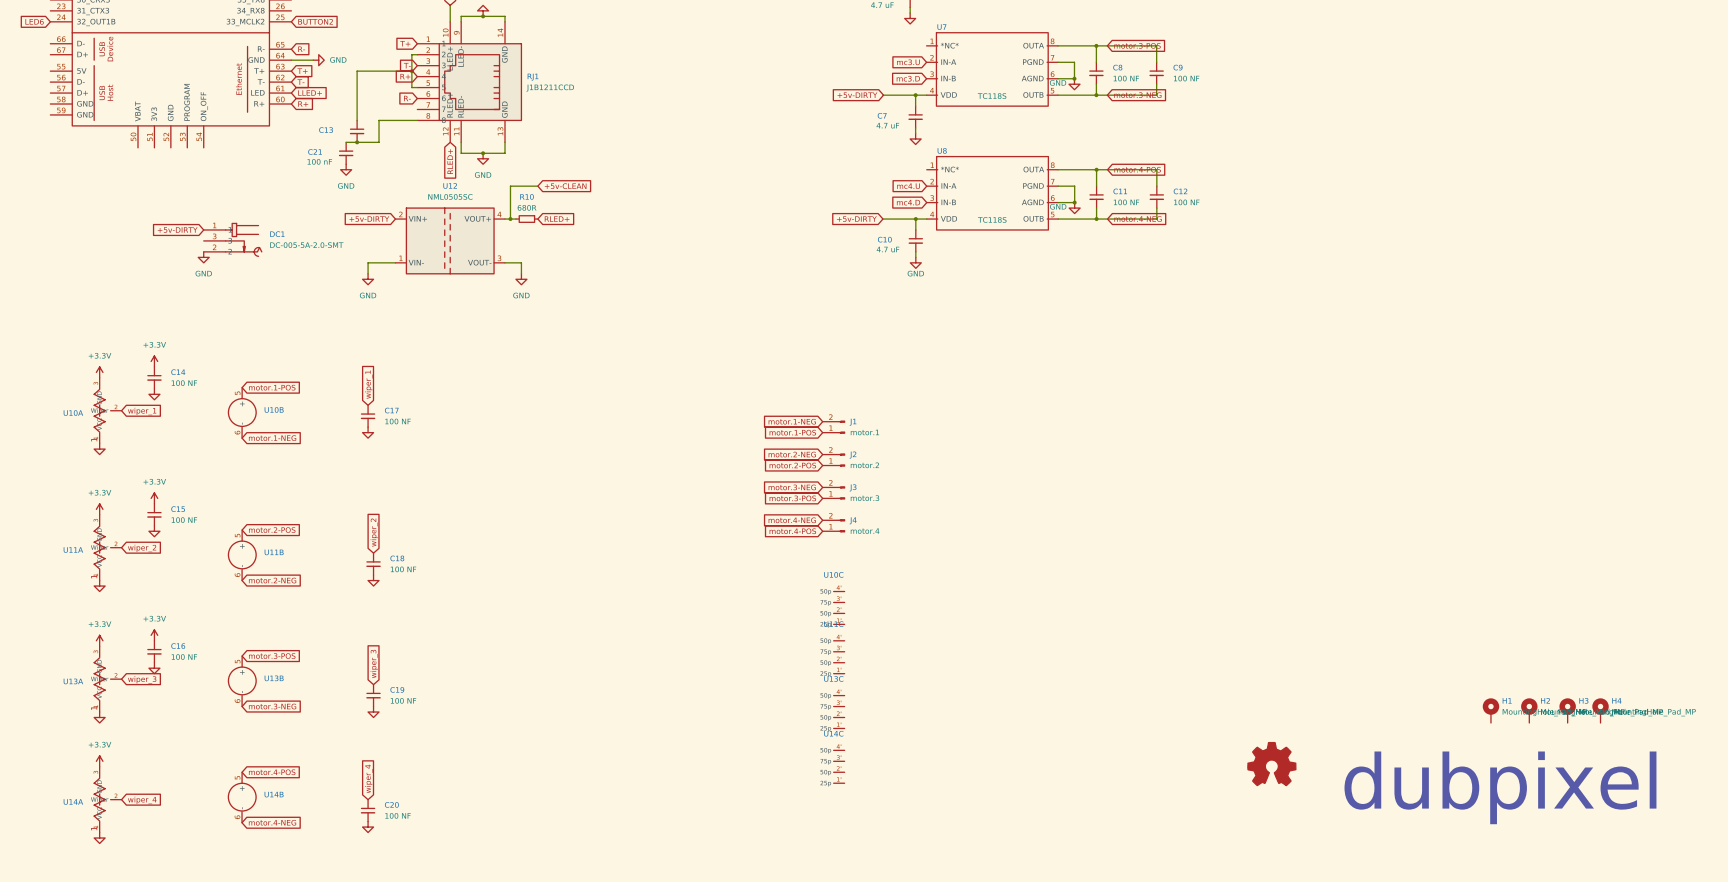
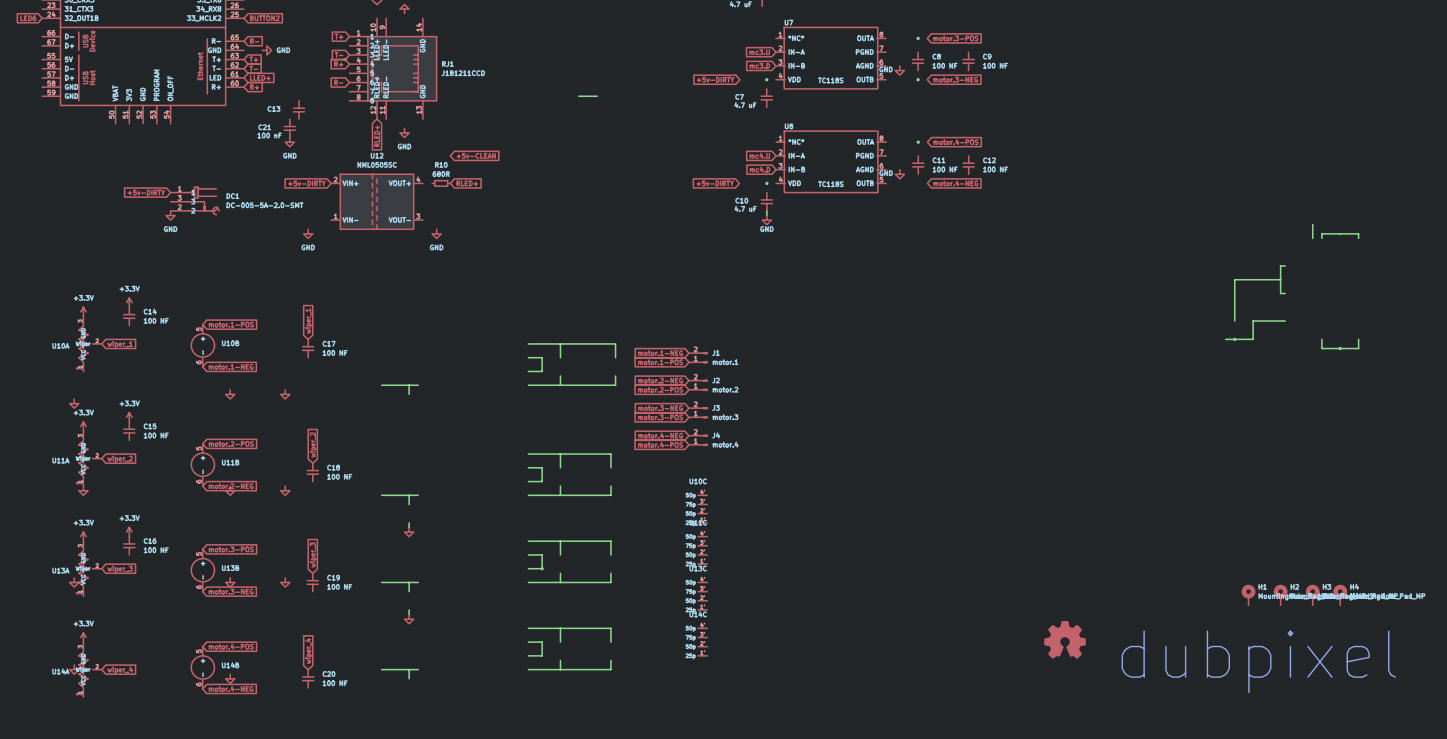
wire: (450, 5) (450, 21) -> none
wire: (910, 7) (910, 13) -> none
junction: (483, 16) -> none
power symbol: (910, 18) -> none
wire: (461, 21) (461, 16) (505, 16) (505, 21) -> none
wire: (1058, 45) (1156, 45) (1156, 62) -> none
wire: (1096, 45) (1096, 62) -> none
wire: (417, 54) (411, 54) (411, 87) (417, 87) -> none
wire: (291, 60) (313, 60) -> none
wire: (1058, 62) (1074, 62) (1074, 78) (1058, 78) -> none
wire: (411, 71) (357, 71) (357, 120) -> none
junction: (1074, 78) -> none
wire: (1096, 84) (1096, 95) -> none
wire: (1156, 84) (1156, 95) (1058, 95) -> none
wire: (882, 95) (926, 95) -> none
wire: (915, 95) (915, 106) -> none
wire: none -> (578, 96) (597, 96)
wire: (417, 120) (379, 120) (379, 142) (346, 142) -> none
wire: (915, 128) (915, 133) -> none
power symbol: (915, 139) -> none
junction: (357, 142) -> none
wire: (461, 142) (461, 153) (505, 153) (505, 142) -> none
junction: (483, 153) -> none
wire: (1058, 169) (1156, 169) (1156, 186) -> none
wire: (1096, 169) (1096, 186) -> none
wire: (537, 186) (510, 186) (510, 219) -> none
wire: (1058, 186) (1074, 186) (1074, 202) (1058, 202) -> none
junction: (1074, 202) -> none
wire: (1096, 208) (1096, 219) -> none
wire: (1156, 208) (1156, 219) (1058, 219) -> none
wire: (505, 219) (515, 219) -> none
junction: (510, 219) -> none
wire: (882, 219) (926, 219) -> none
wire: (915, 219) (915, 229) -> none
junction: (1096, 219) -> none
wire: (395, 262) (368, 262) (368, 273) -> none
wire: (505, 262) (521, 262) (521, 273) -> none
wire: none -> (1312, 224) (1312, 238)
wire: none -> (1321, 238) (1321, 233) (1358, 233) (1358, 238)
wire: none -> (1285, 265) (1280, 265) (1280, 293) (1285, 293)
wire: none -> (1280, 279) (1234, 279) (1234, 321)
wire: none -> (1285, 321) (1253, 321) (1253, 339) (1225, 339)
power symbol: (154, 394) -> none
junction: none -> (1234, 339)
wire: none -> (1321, 339) (1321, 348) (1358, 348) (1358, 339)
wire: none -> (528, 343) (615, 343) (615, 357)
wire: none -> (560, 343) (560, 357)
junction: none -> (1340, 348)
wire: none -> (528, 357) (542, 357) (542, 371) (528, 371)
power symbol position: (368, 432) -> (285, 394)
power symbol position: (99, 449) -> (74, 403)
wire: none -> (560, 376) (560, 385)
wire: none -> (615, 376) (615, 385) (528, 385)
wire: none -> (381, 385) (418, 385)
wire: none -> (409, 385) (409, 394)
power symbol: none -> (230, 394)
power symbol: (154, 531) -> none
wire: none -> (528, 454) (610, 454) (610, 467)
wire: none -> (560, 454) (560, 467)
wire: none -> (528, 467) (542, 467) (542, 481) (528, 481)
power symbol position: (373, 580) -> (285, 490)
wire: none -> (560, 486) (560, 495)
wire: none -> (610, 486) (610, 495) (528, 495)
power symbol: none -> (230, 490)
wire: none -> (381, 495) (418, 495)
wire: none -> (409, 495) (409, 504)
wire: none -> (409, 522) (409, 527)
power symbol: none -> (409, 532)
wire: none -> (528, 541) (610, 541) (610, 554)
wire: none -> (560, 541) (560, 554)
wire: none -> (528, 554) (542, 554) (542, 568) (528, 568)
power symbol: (154, 668) -> none
junction: none -> (542, 568)
wire: none -> (560, 573) (560, 582)
wire: none -> (610, 573) (610, 582) (528, 582)
power symbol: none -> (230, 582)
wire: none -> (381, 582) (418, 582)
wire: none -> (409, 582) (409, 591)
power symbol position: (373, 712) -> (285, 582)
power symbol position: (99, 717) -> (74, 582)
wire: none -> (409, 609) (409, 614)
power symbol: none -> (409, 619)
wire: none -> (528, 628) (610, 628) (610, 642)
wire: none -> (560, 628) (560, 642)
wire: none -> (528, 642) (542, 642) (542, 655) (528, 655)
wire: none -> (560, 660) (560, 669)
wire: none -> (610, 660) (610, 669) (528, 669)
wire: none -> (381, 669) (418, 669)
wire: none -> (409, 669) (409, 678)
power symbol: none -> (230, 678)
power symbol: (368, 827) -> none
power symbol position: (99, 838) -> (74, 669)

